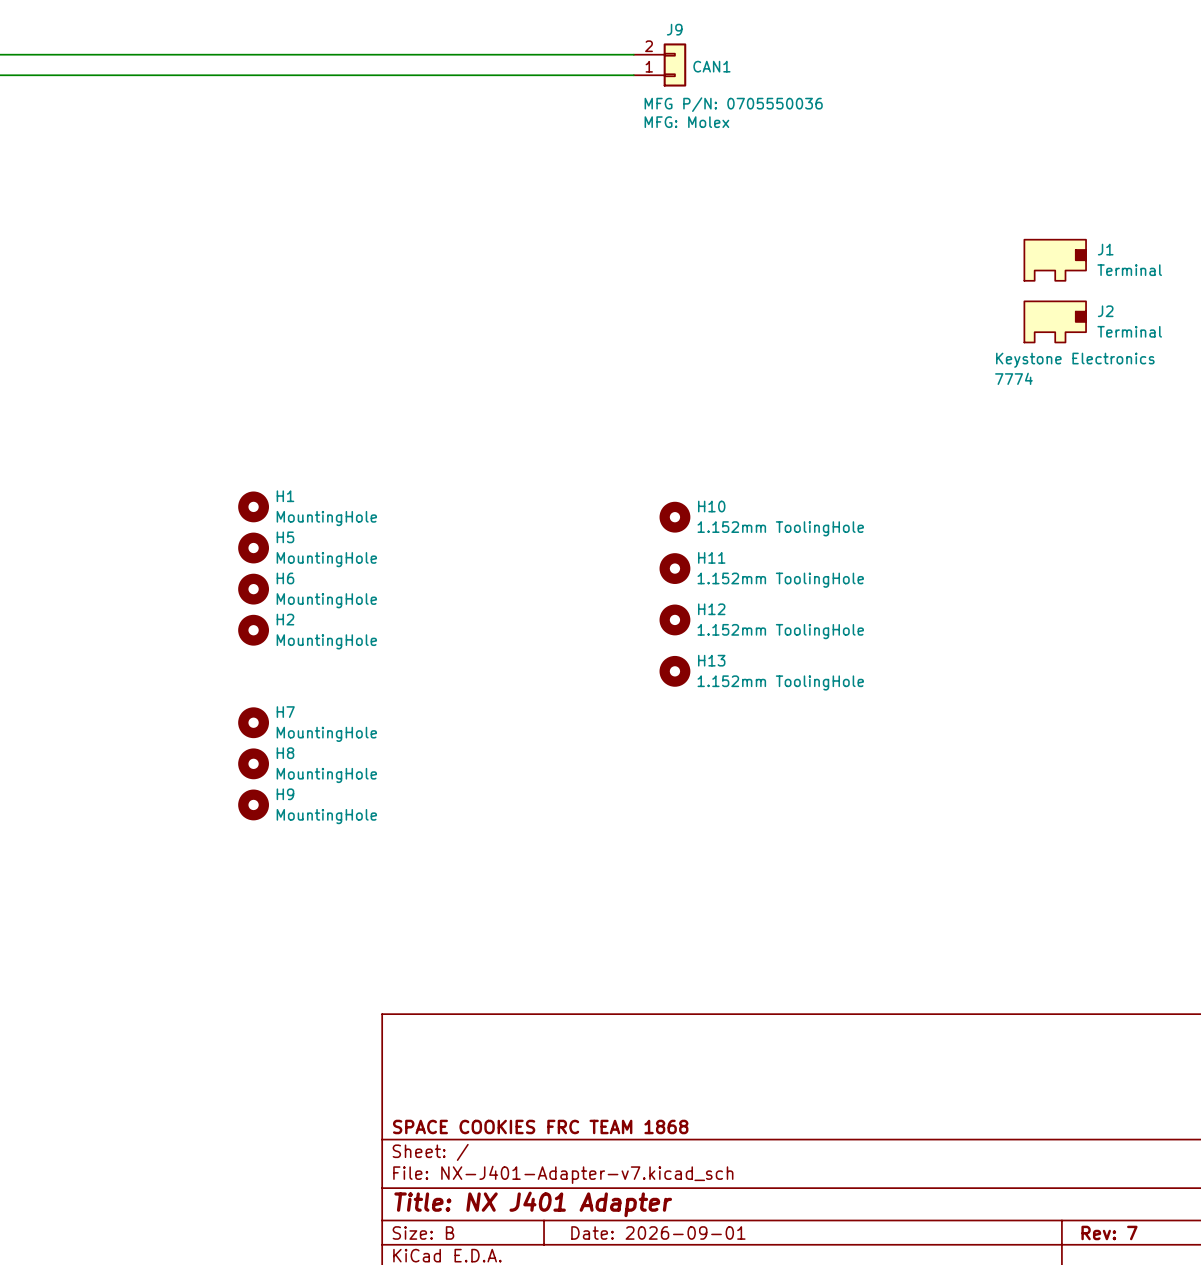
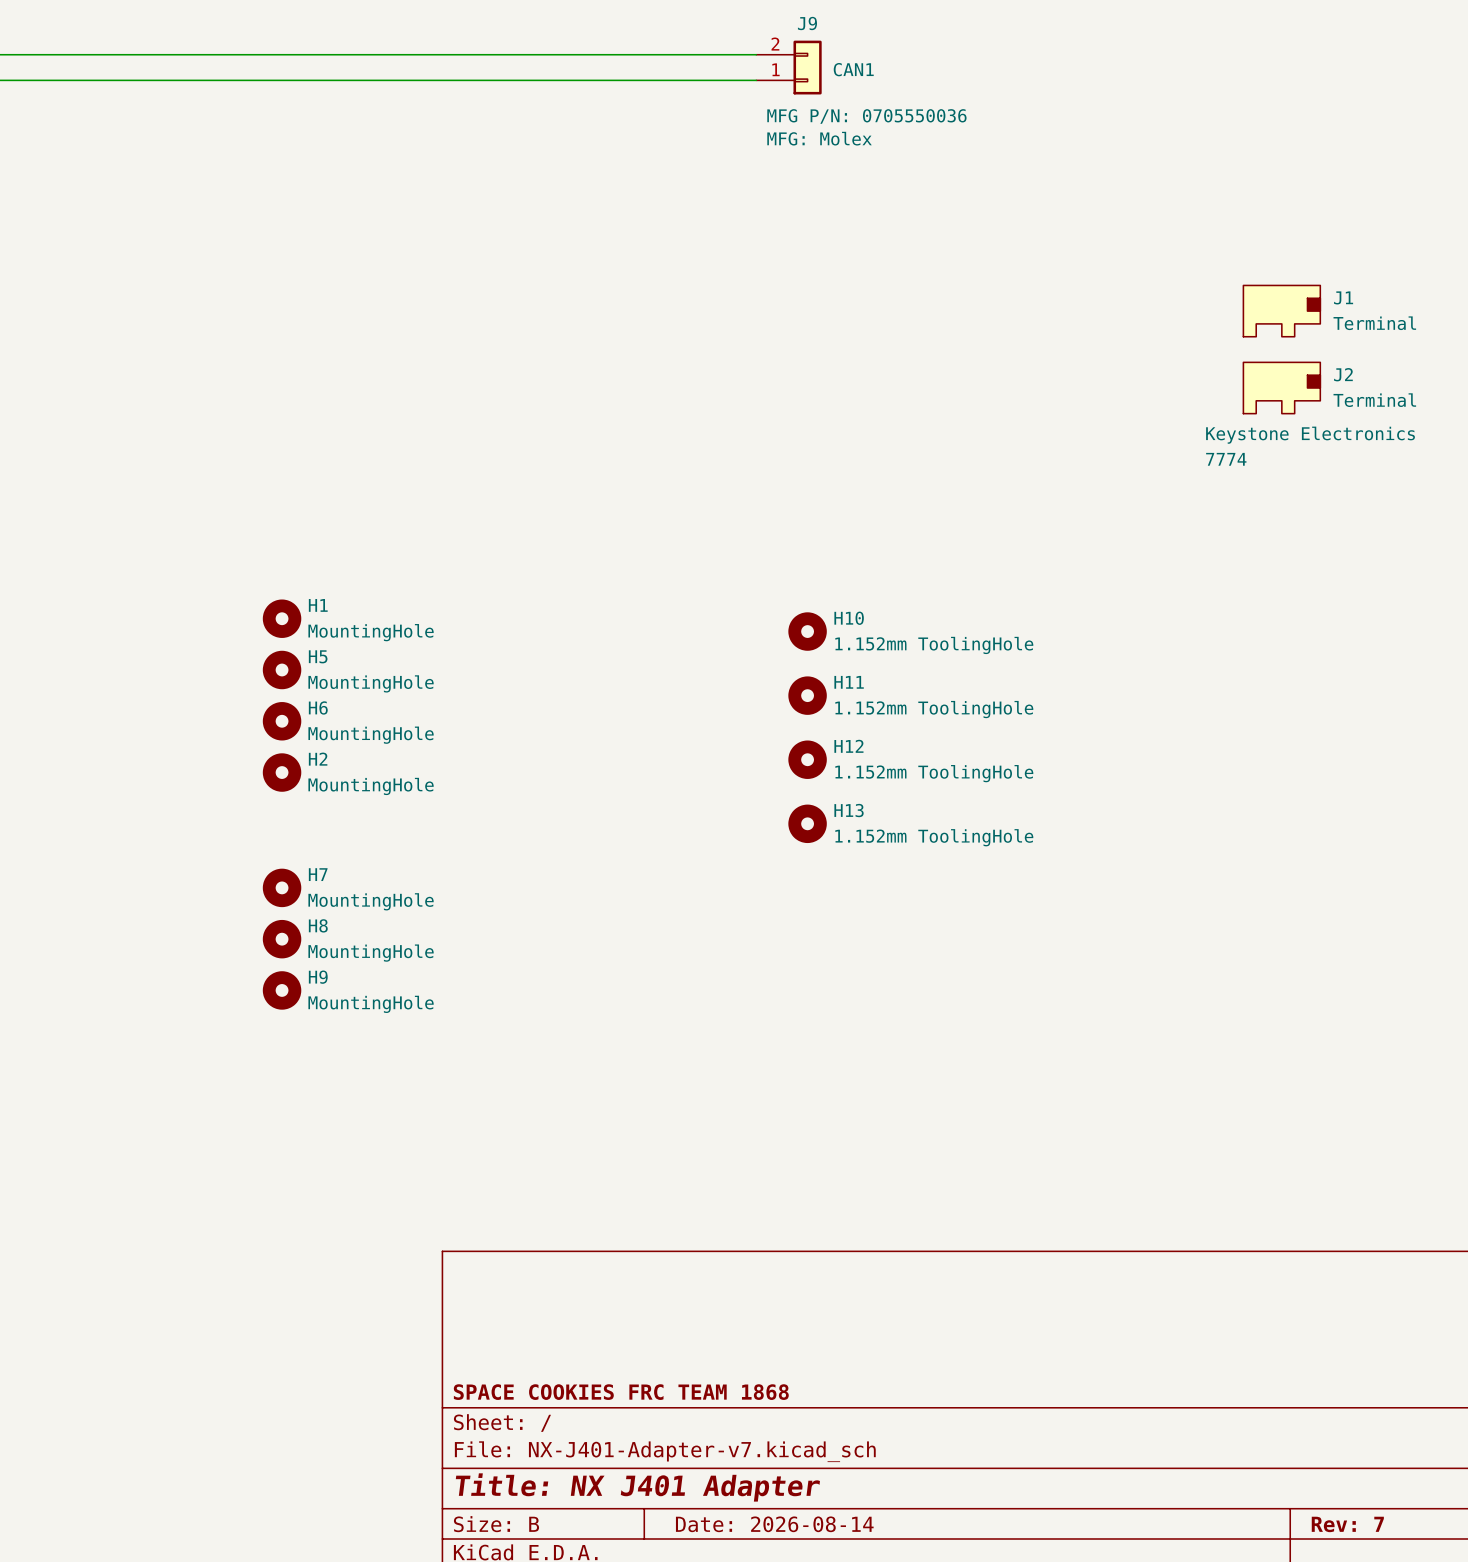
title block: Date: 2026-09-01 (658, 1232) -> Date: 2026-08-14 (774, 1524)

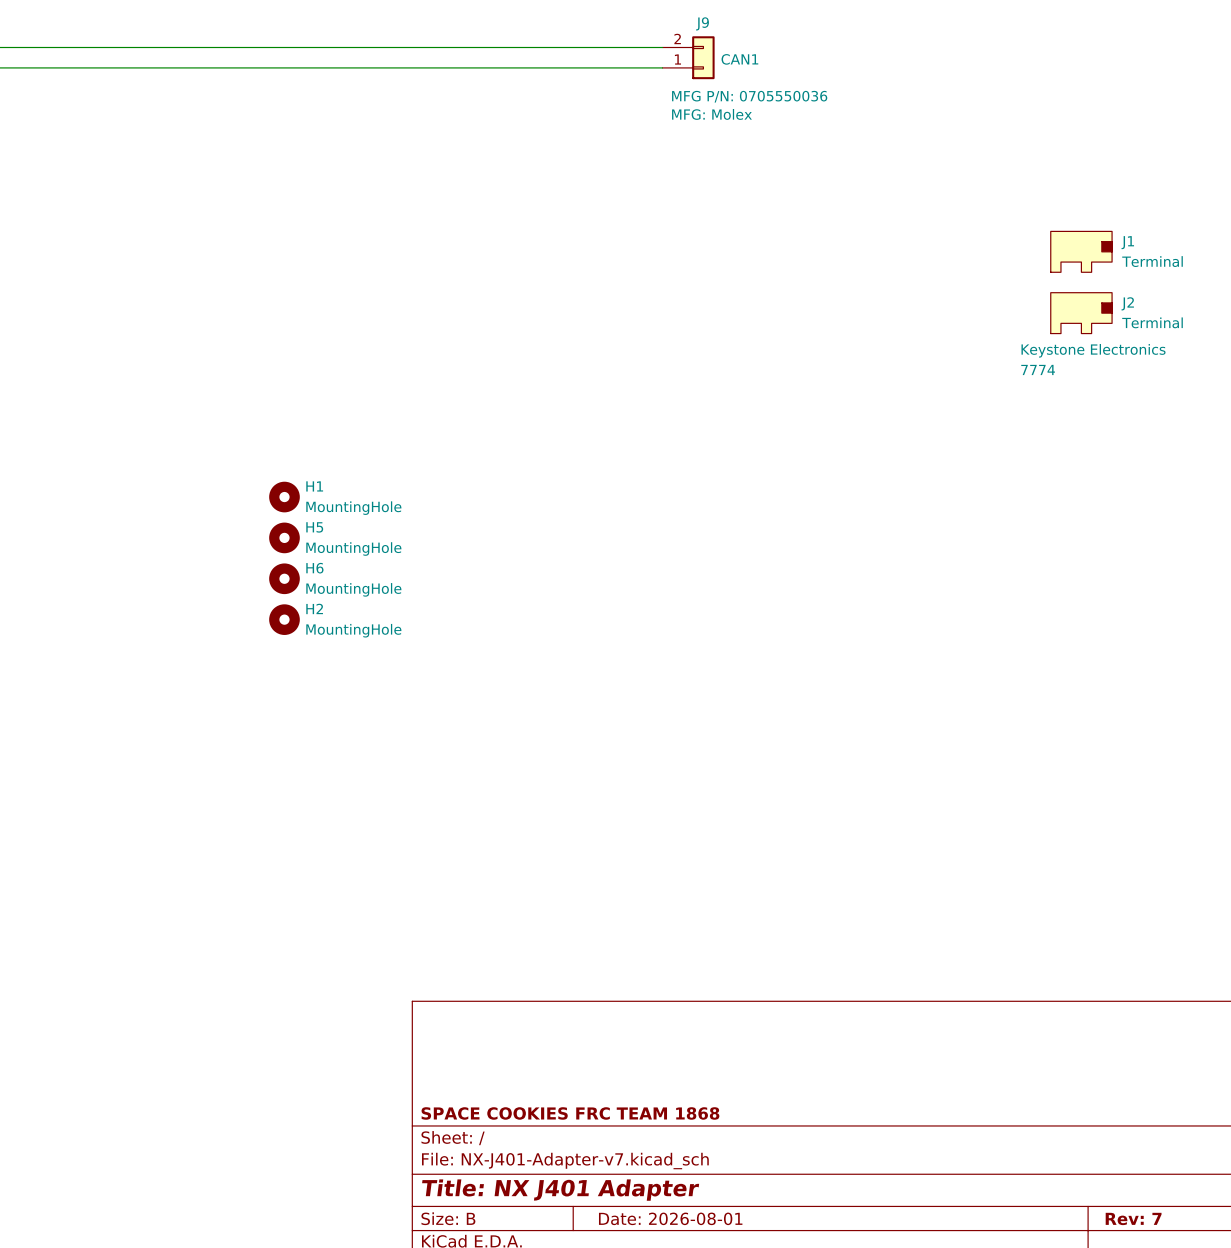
H10: 1.152mm ToolingHole (807, 631) -> none
H11: 1.152mm ToolingHole (807, 695) -> none
H12: 1.152mm ToolingHole (807, 759) -> none
H13: 1.152mm ToolingHole (807, 823) -> none
H7: MountingHole (282, 887) -> none
H8: MountingHole (282, 939) -> none
H9: MountingHole (282, 990) -> none
title block: Date: 2026-08-14 (774, 1524) -> Date: 2026-08-01 (670, 1218)

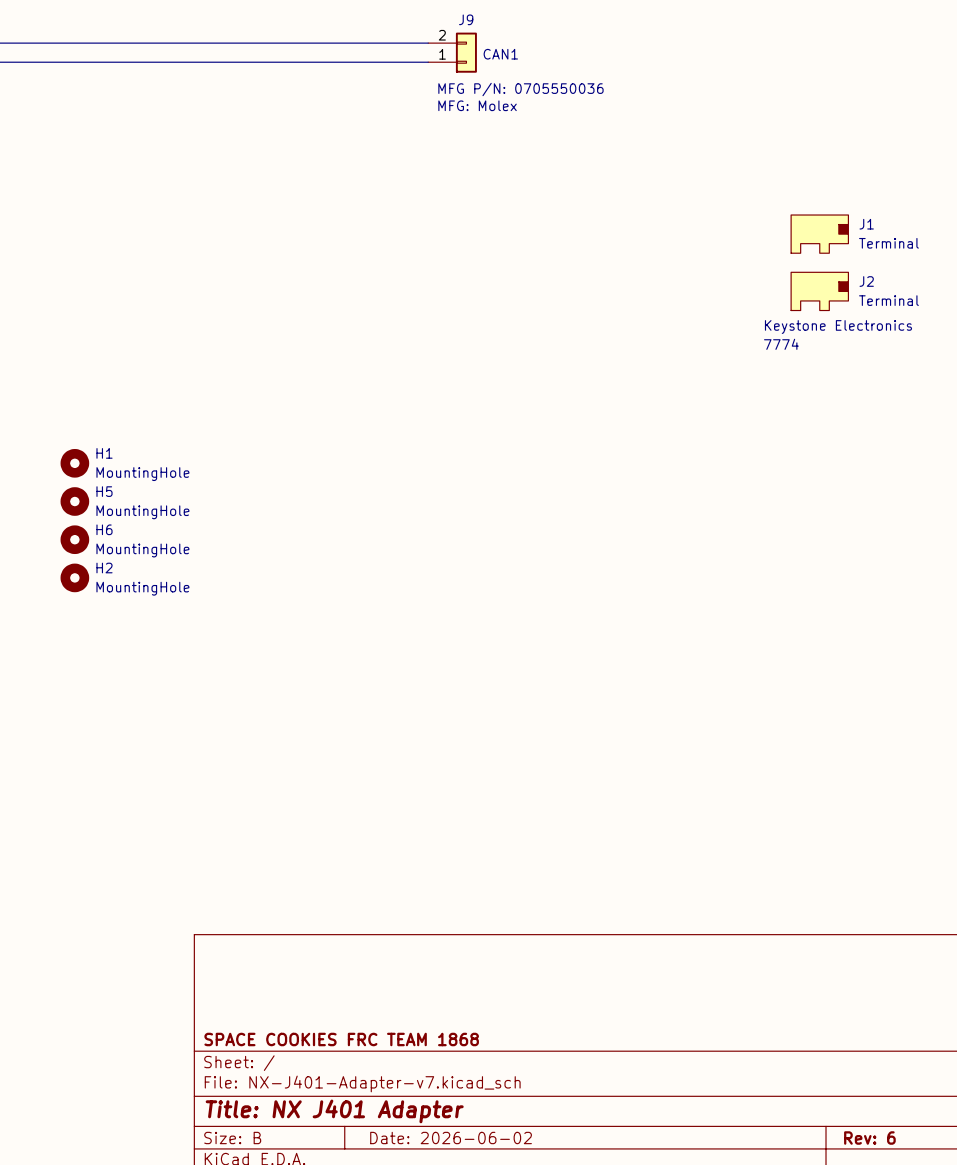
title block: Date: 2026-08-01 (670, 1218) -> Date: 2026-06-02 (451, 1138)
title block: Rev: 7 (1133, 1218) -> Rev: 6 (869, 1138)

